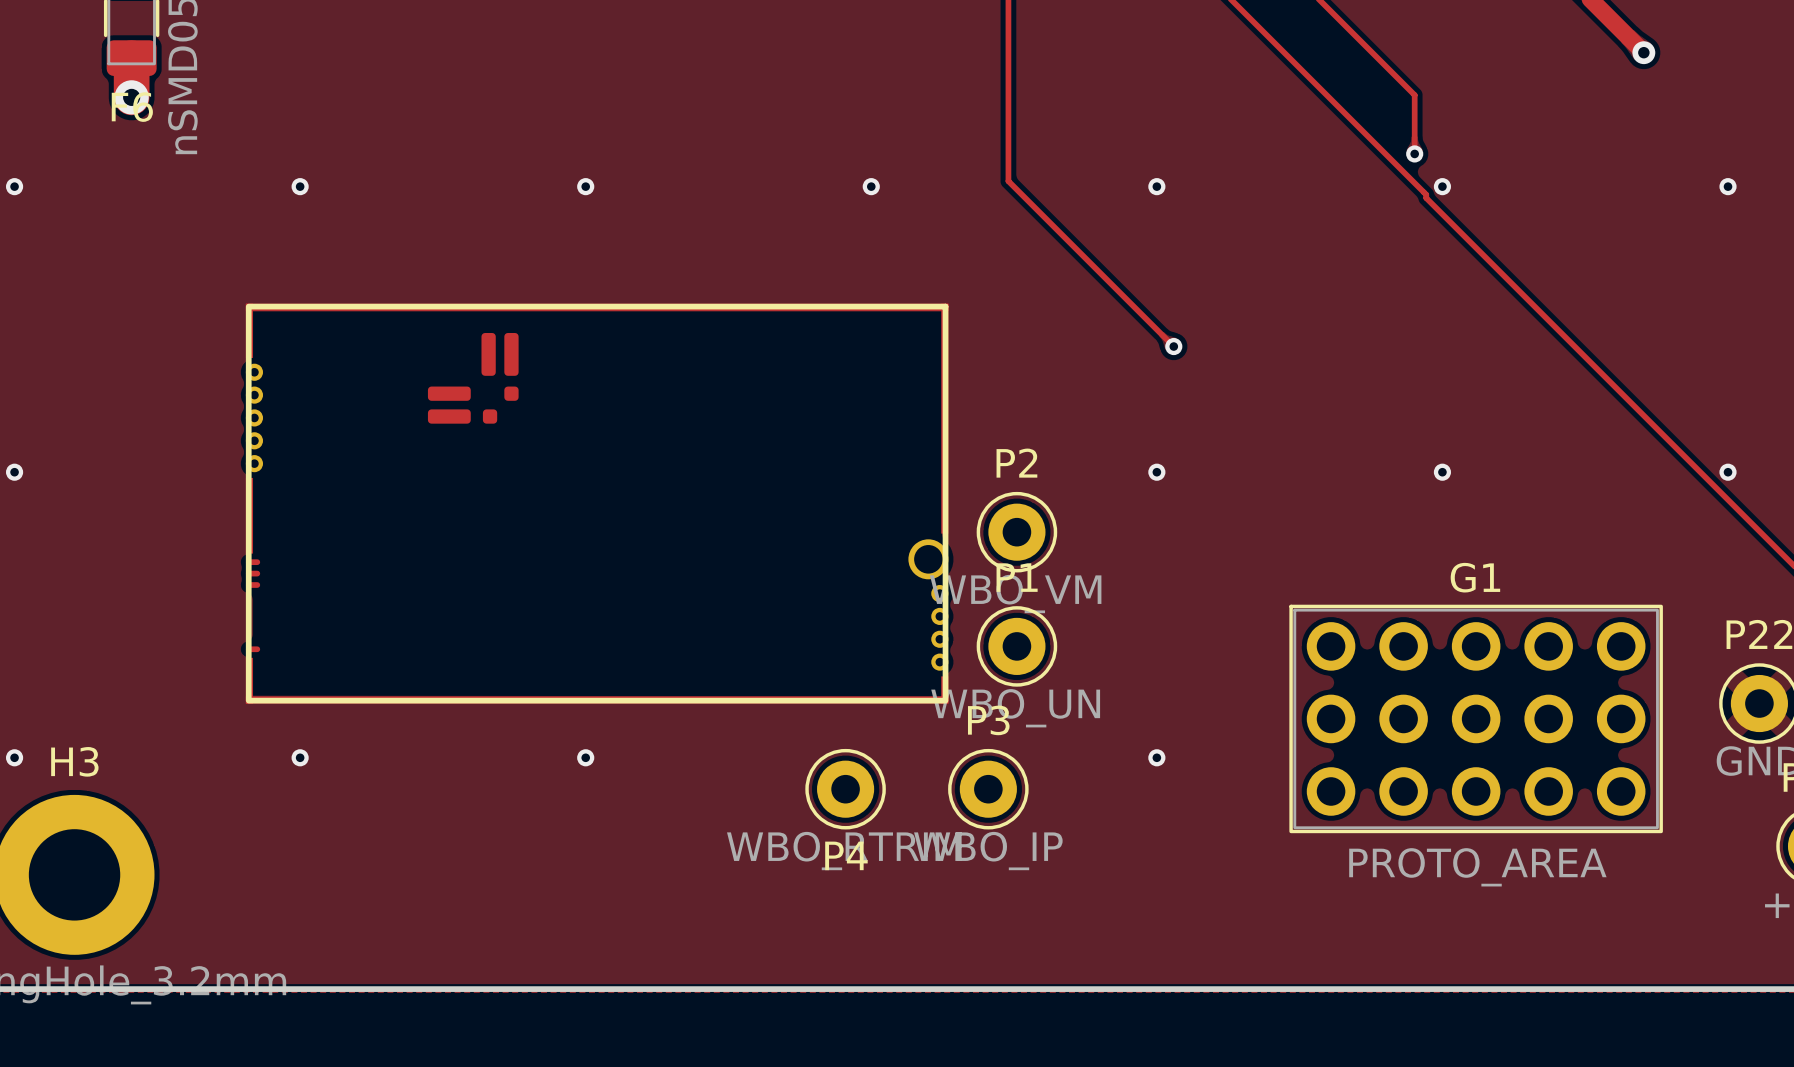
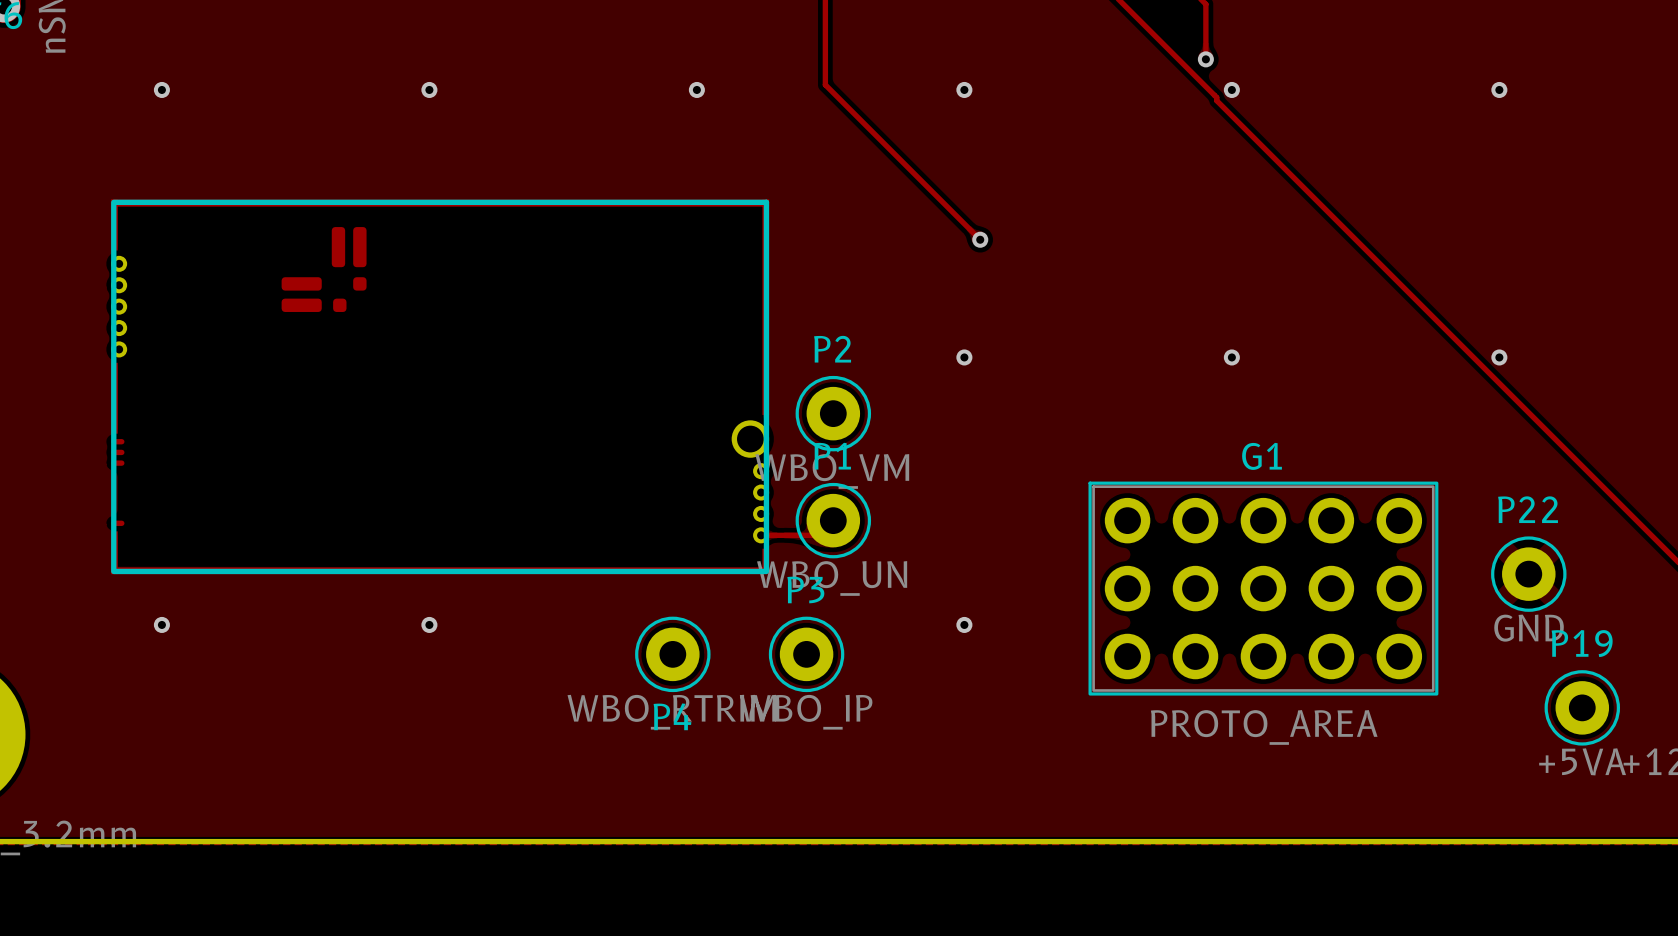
track: none -> (833, 520) (818, 535) (761, 535)

